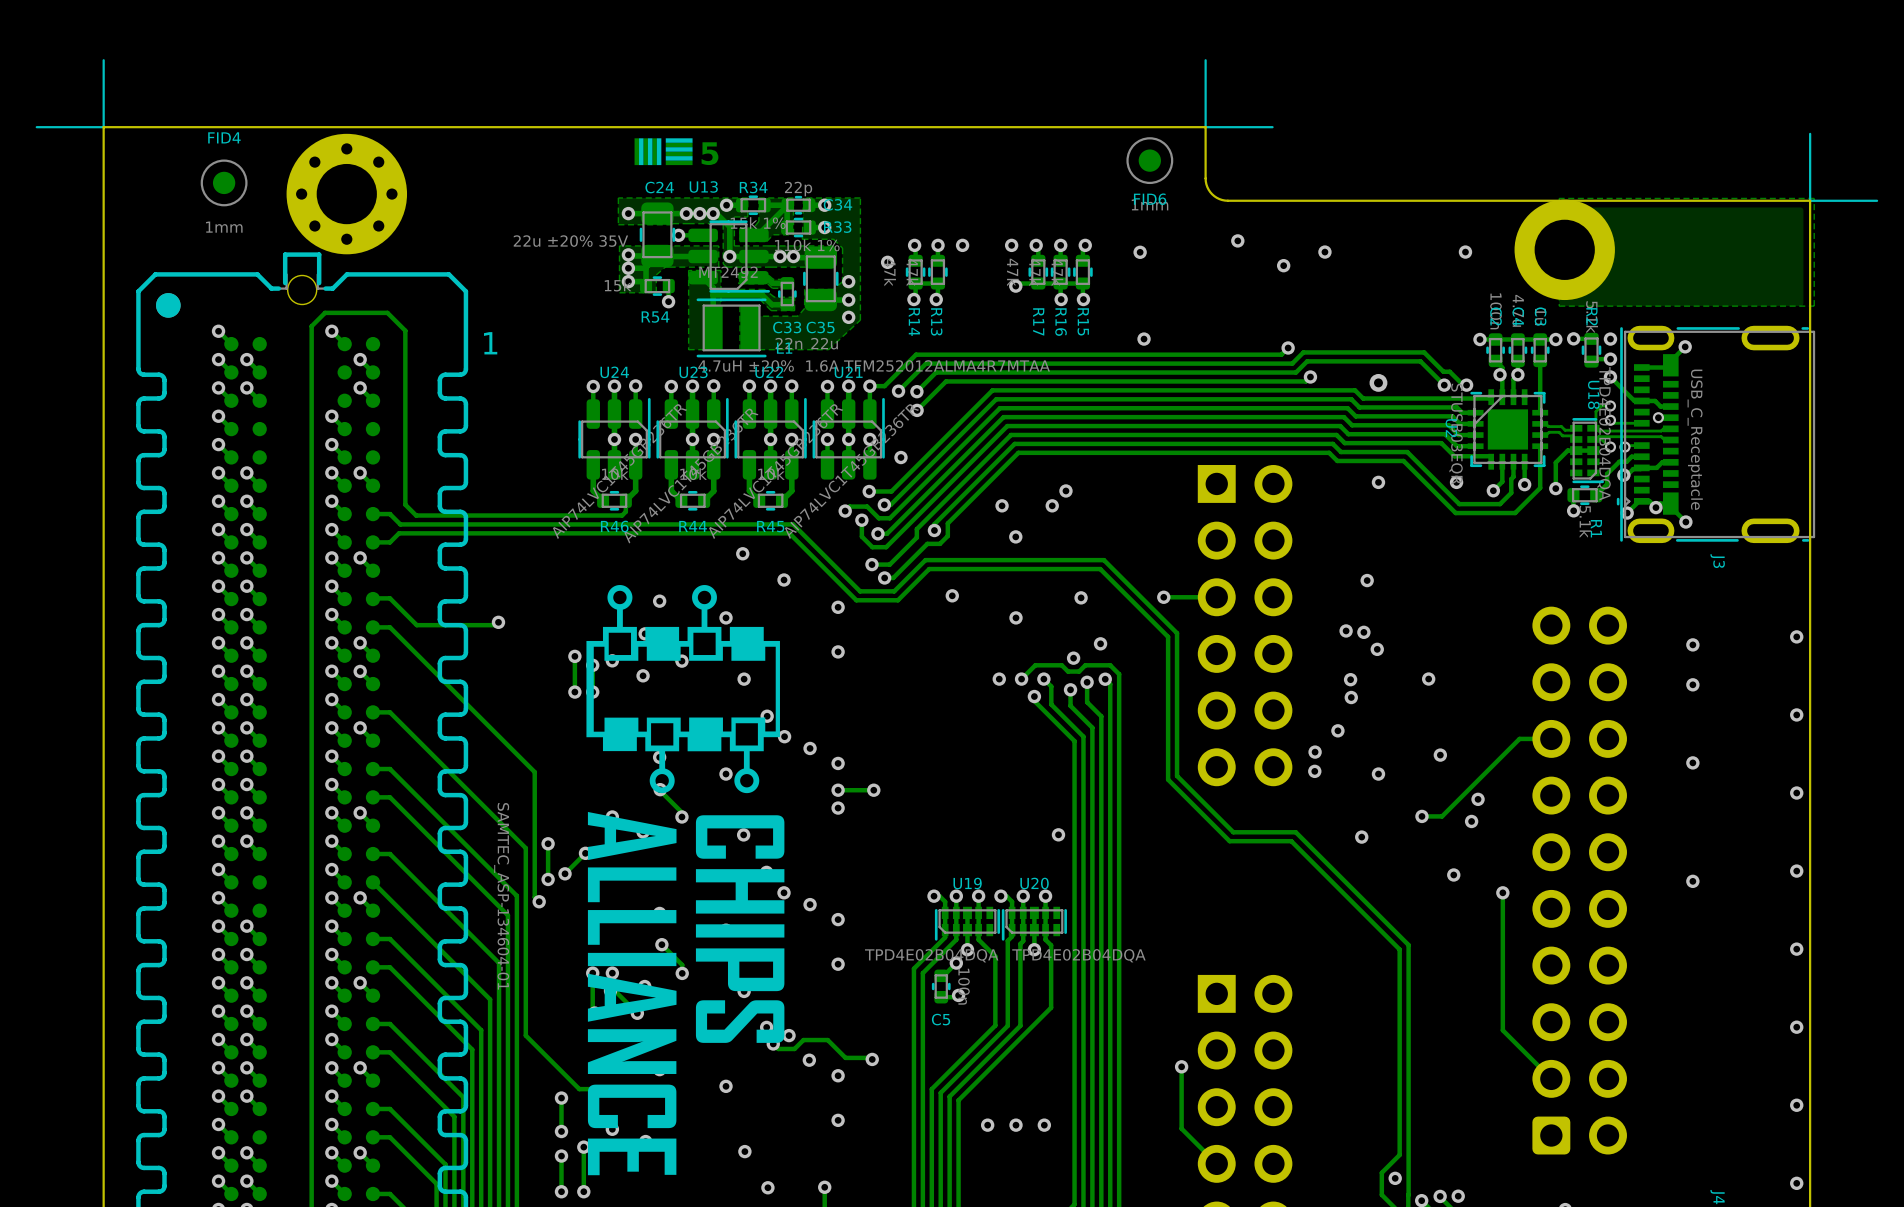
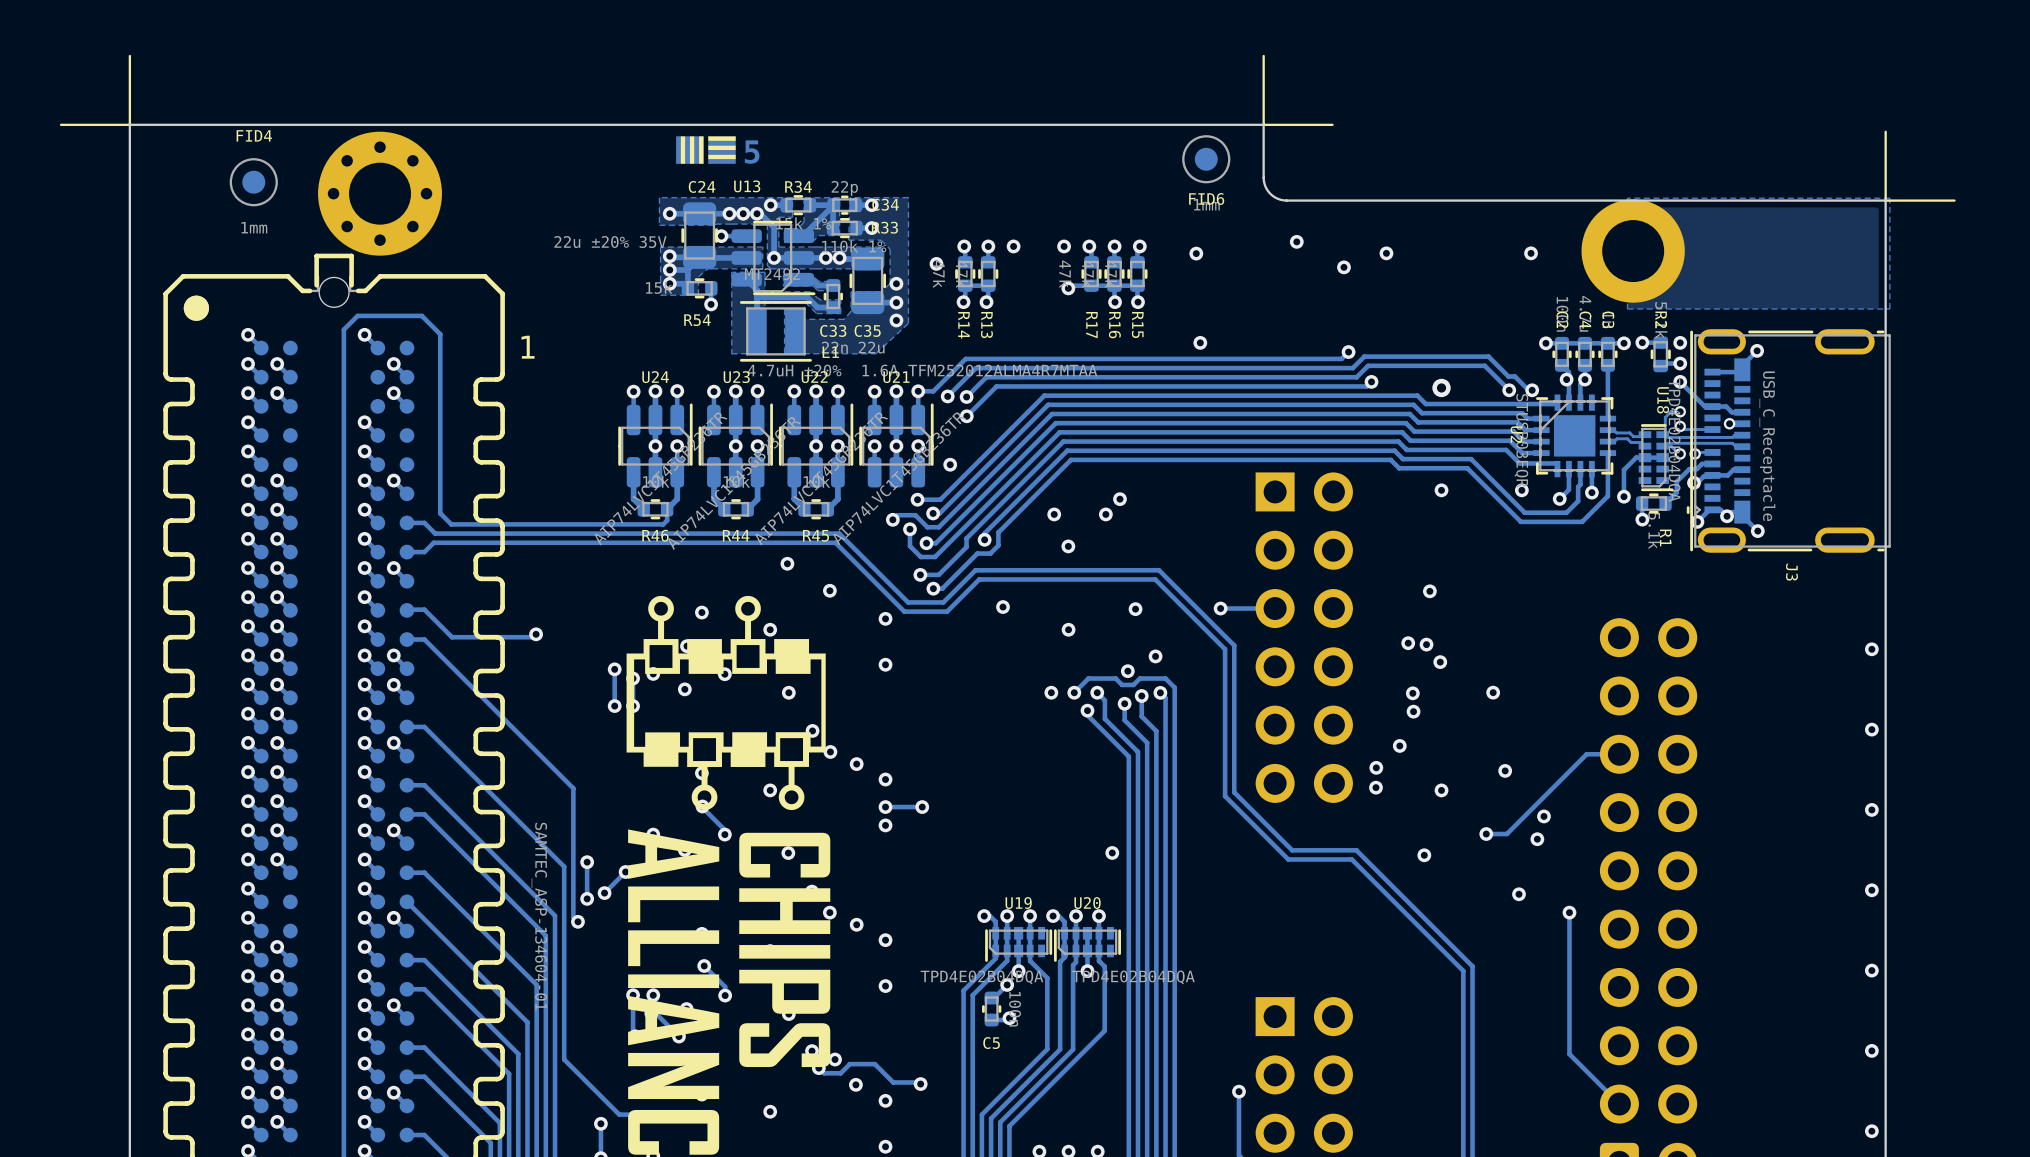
via: (1692, 644) -> none
via: (1692, 684) -> none
via: (1692, 762) -> none
via: (1692, 881) -> none

